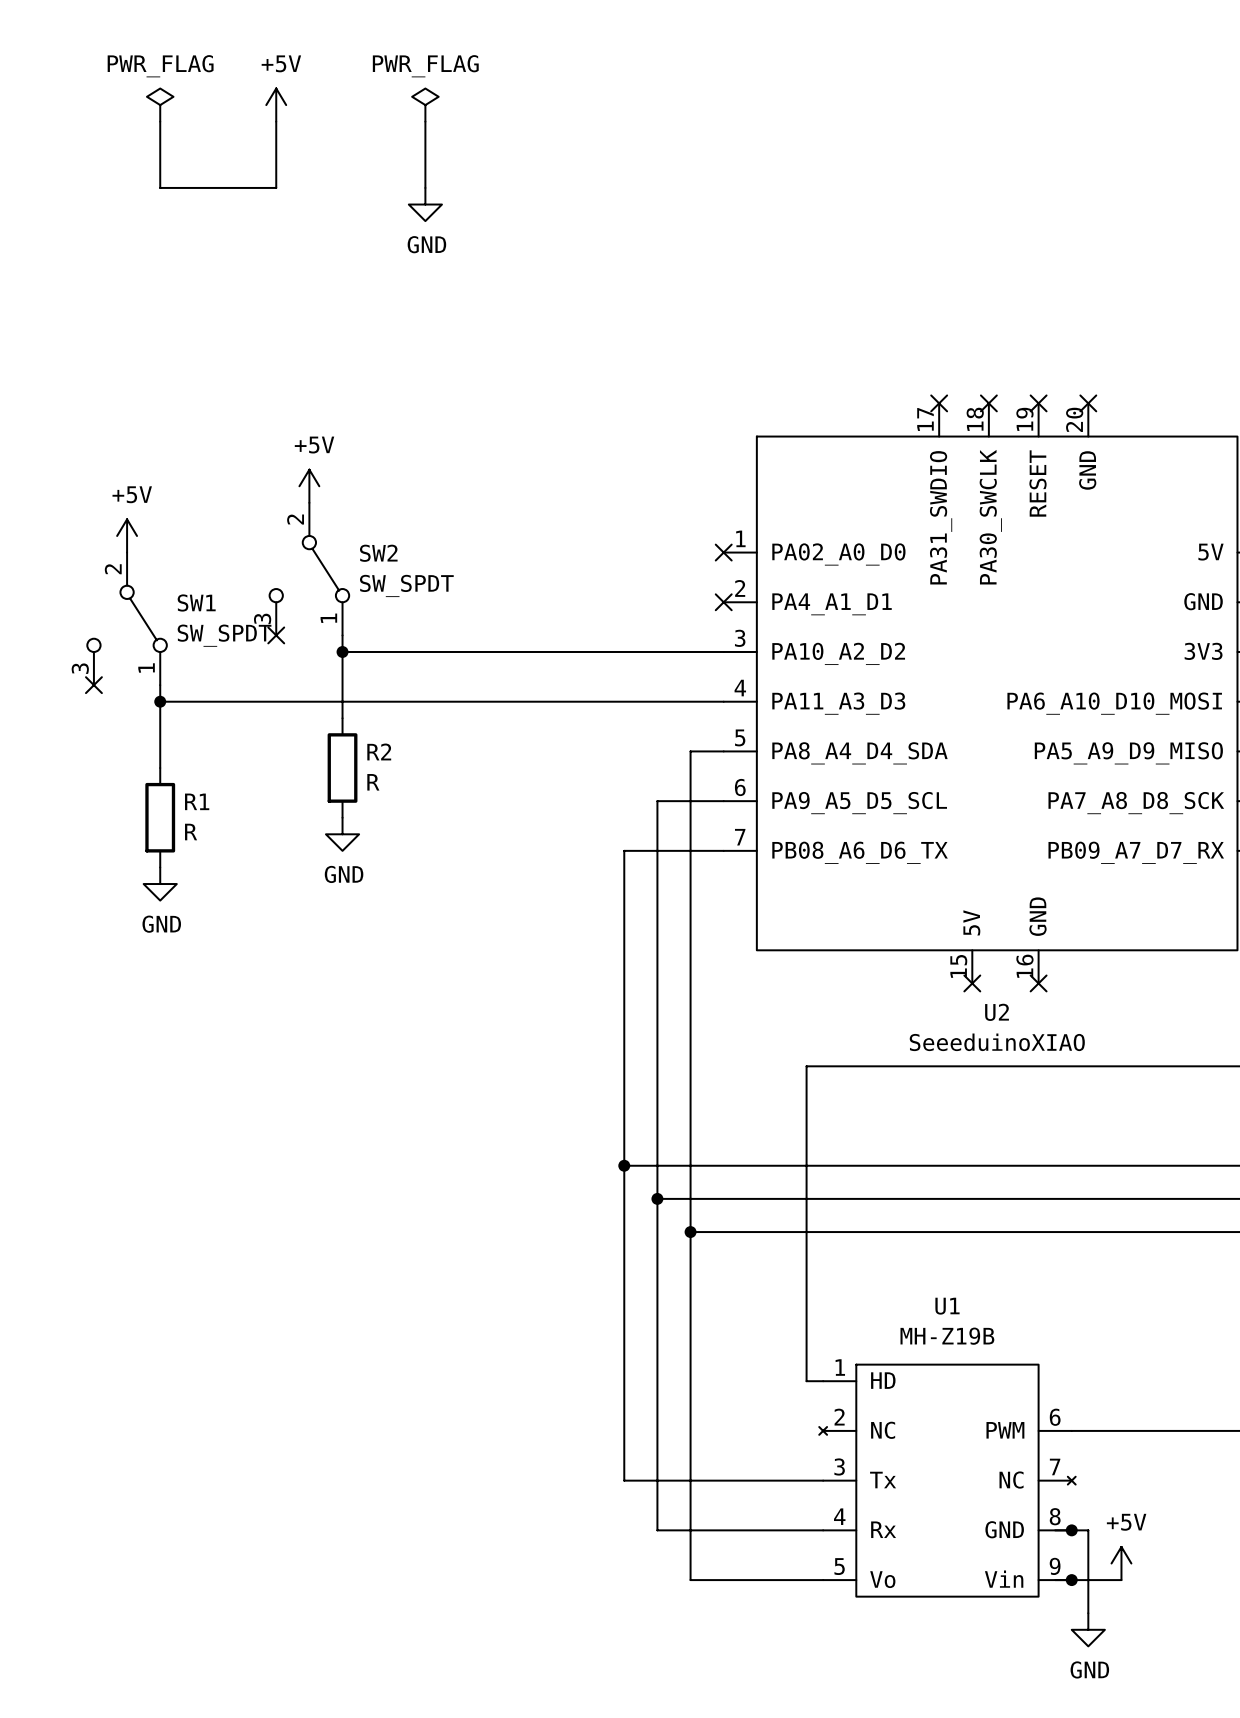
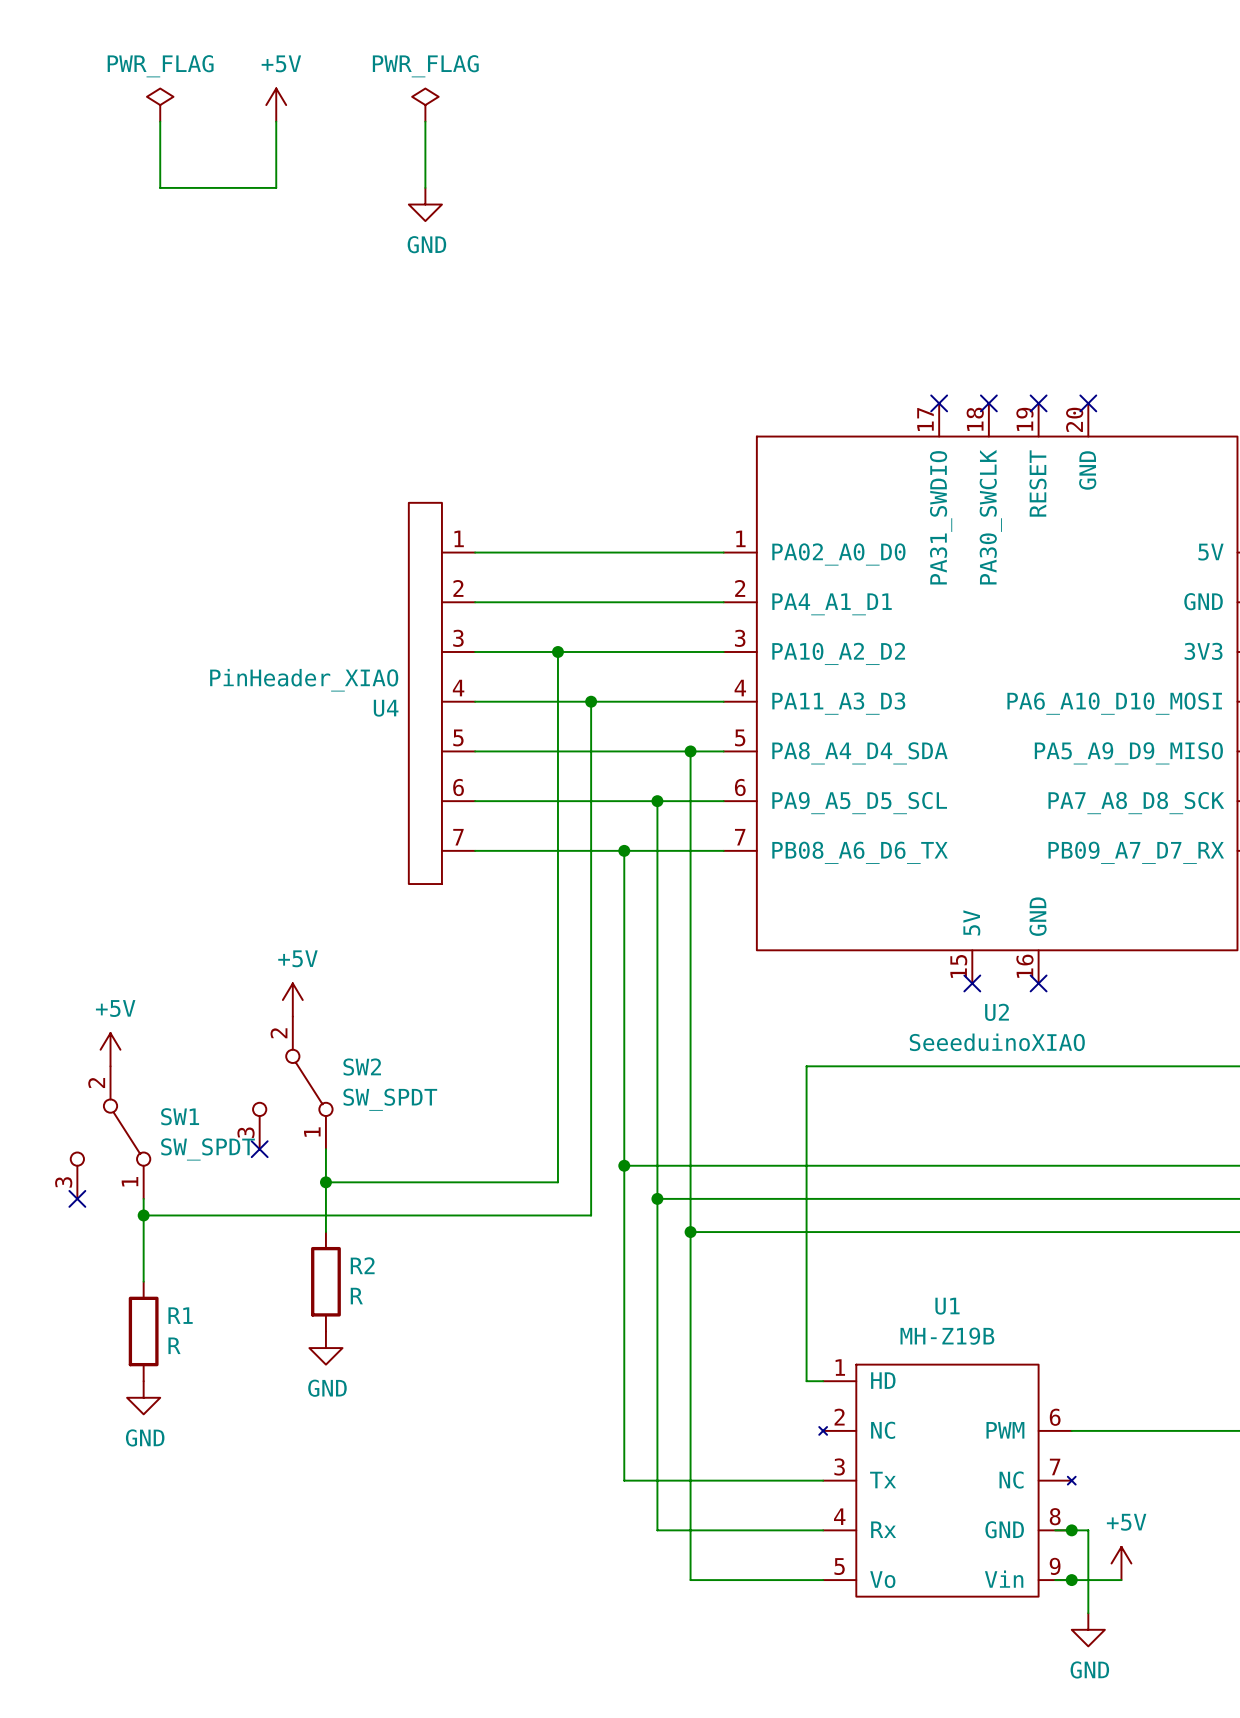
power symbol: +5V (309, 486) -> none
power symbol: +5V (127, 535) -> none
wire: none -> (475, 552) (723, 552)
no-connect mark: (723, 552) -> none
SW2 position: (309, 569) -> (292, 1082)
wire: none -> (475, 602) (723, 602)
no-connect mark: (723, 602) -> none
SW1 position: (127, 618) -> (110, 1132)
no-connect mark: (276, 635) -> none
wire: (342, 635) (342, 718) -> none
wire: (342, 651) (475, 651) -> none
junction: (342, 651) -> none
wire: none -> (557, 651) (557, 1182) (325, 1182)
junction: none -> (557, 651)
no-connect mark: (93, 685) -> none
wire: (160, 685) (160, 768) -> none
U4: none -> PinHeader_XIAO (441, 693)
wire: (160, 701) (475, 701) -> none
junction: (160, 701) -> none
wire: none -> (591, 701) (591, 1215) (143, 1215)
junction: none -> (591, 701)
wire: none -> (475, 751) (690, 751)
junction: none -> (690, 751)
R2 position: (342, 768) -> (325, 1281)
wire: none -> (475, 801) (657, 801)
junction: none -> (657, 801)
R1 position: (160, 817) -> (143, 1331)
power symbol: GND (342, 834) -> none
wire: none -> (475, 850) (624, 850)
junction: none -> (624, 850)
power symbol: GND (160, 884) -> none
power symbol: none -> +5V (292, 1000)
power symbol: none -> +5V (110, 1049)
no-connect mark: none -> (259, 1149)
wire: none -> (325, 1149) (325, 1232)
junction: none -> (325, 1182)
no-connect mark: none -> (77, 1198)
wire: none -> (143, 1198) (143, 1281)
junction: none -> (143, 1215)
power symbol: none -> GND (325, 1348)
power symbol: none -> GND (143, 1397)

